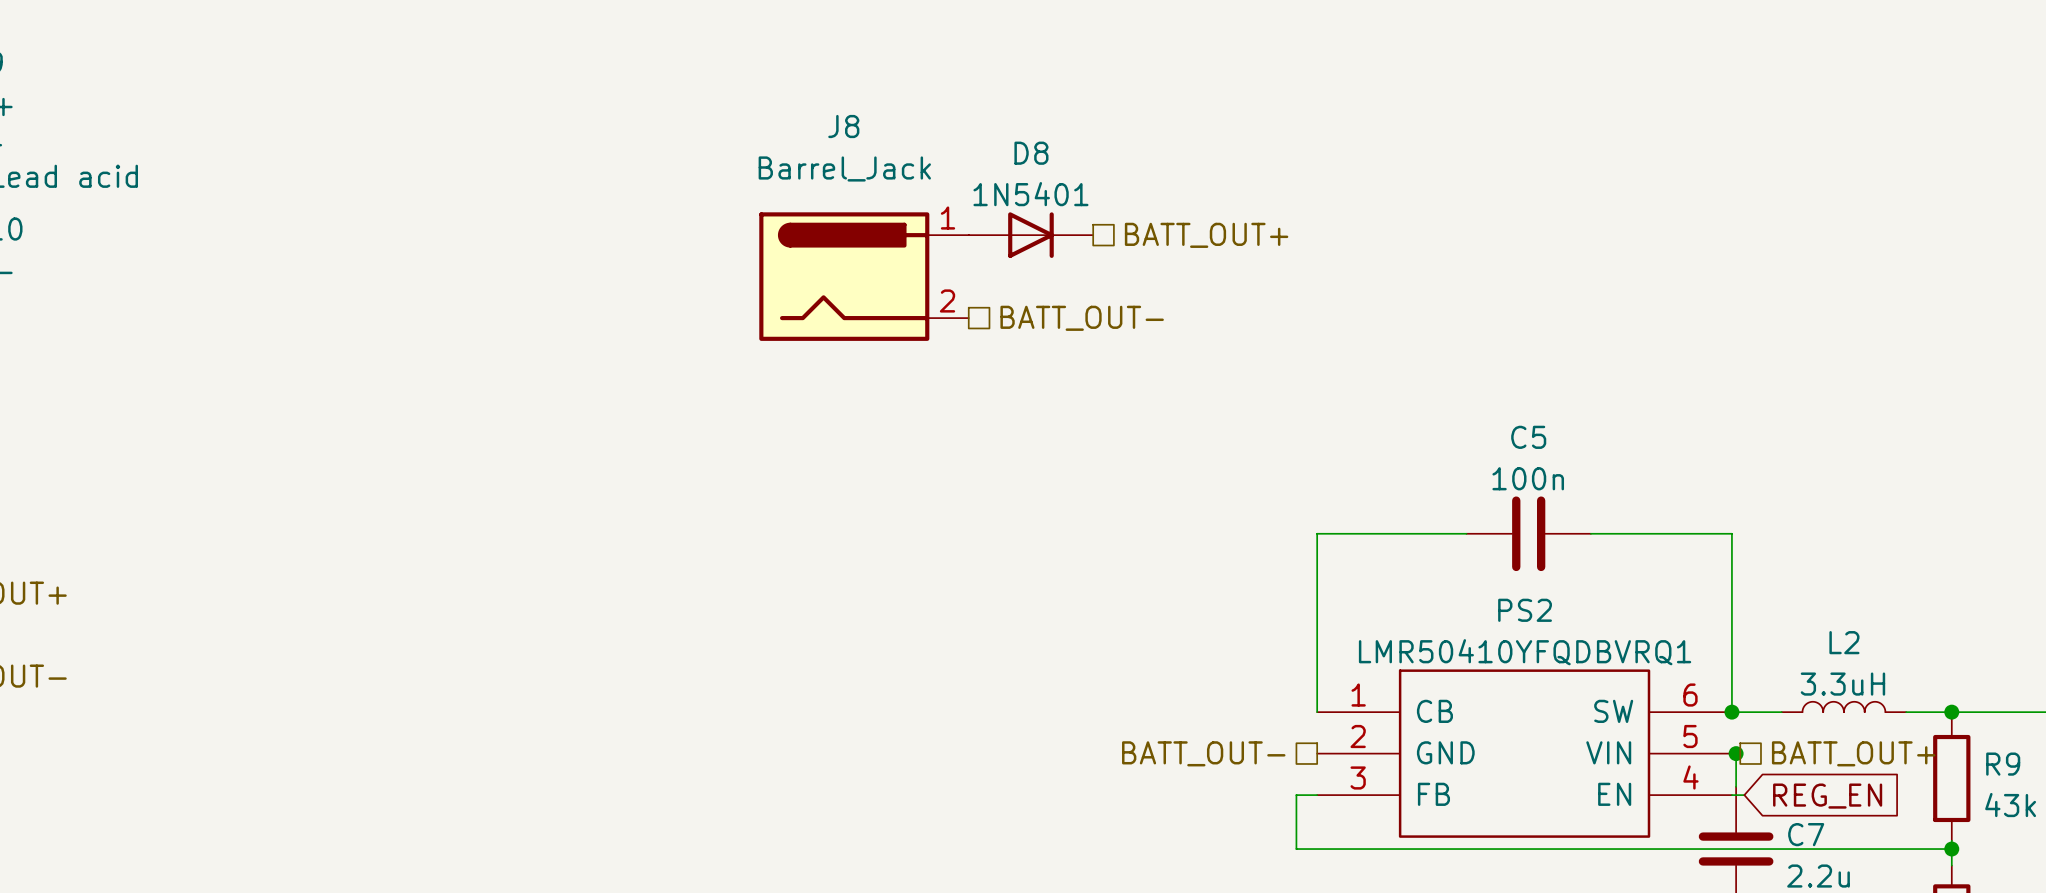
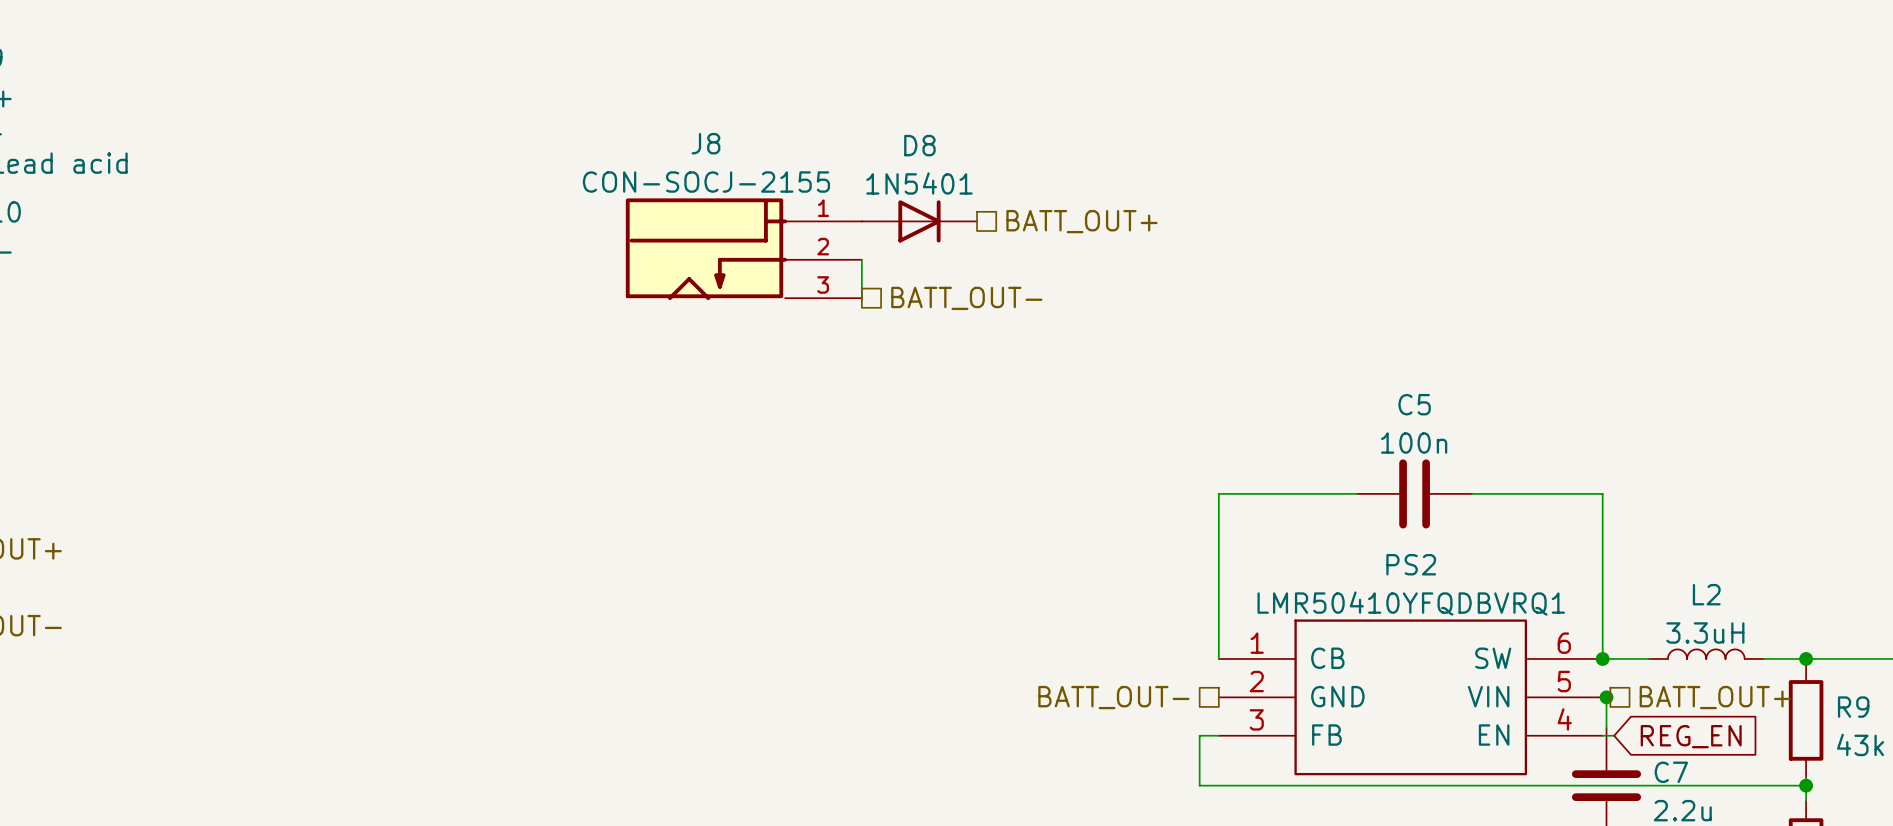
J8 name position: J8 (843, 126) -> J8 (705, 143)
J8 value: Barrel_Jack (844, 168) -> CON-SOCJ-2155 (706, 182)
J8 symbol: [759, 212, 969, 341] -> [625, 198, 862, 301]
D8 position: (1030, 235) -> (919, 221)
hierarchical label position: BATT_OUT+ (1206, 235) -> BATT_OUT+ (1081, 221)
wire: none -> (861, 259) (861, 298)
hierarchical label position: BATT_OUT- (1082, 318) -> BATT_OUT- (966, 298)

